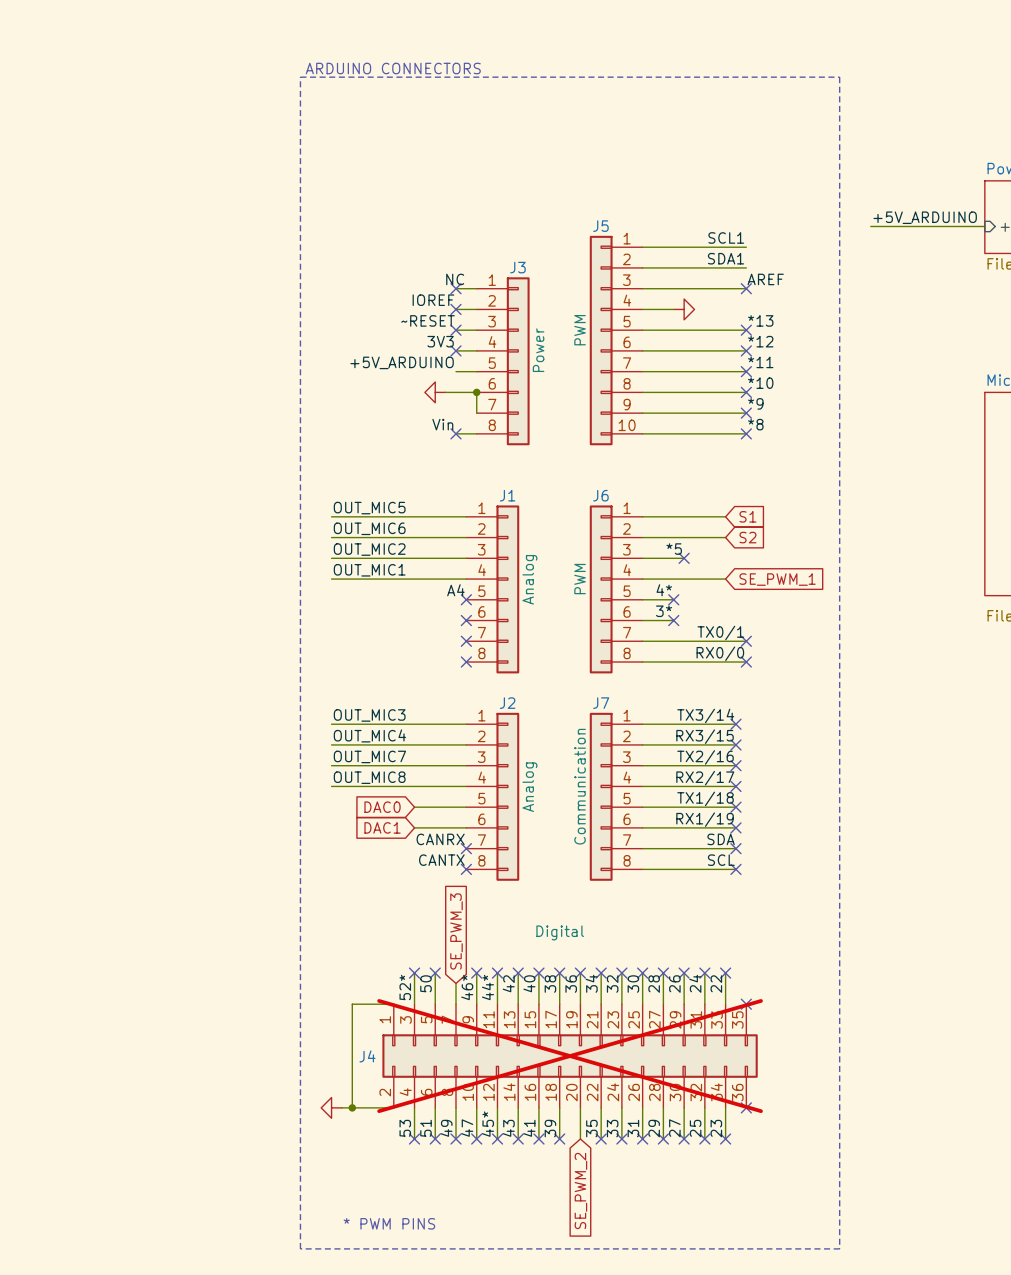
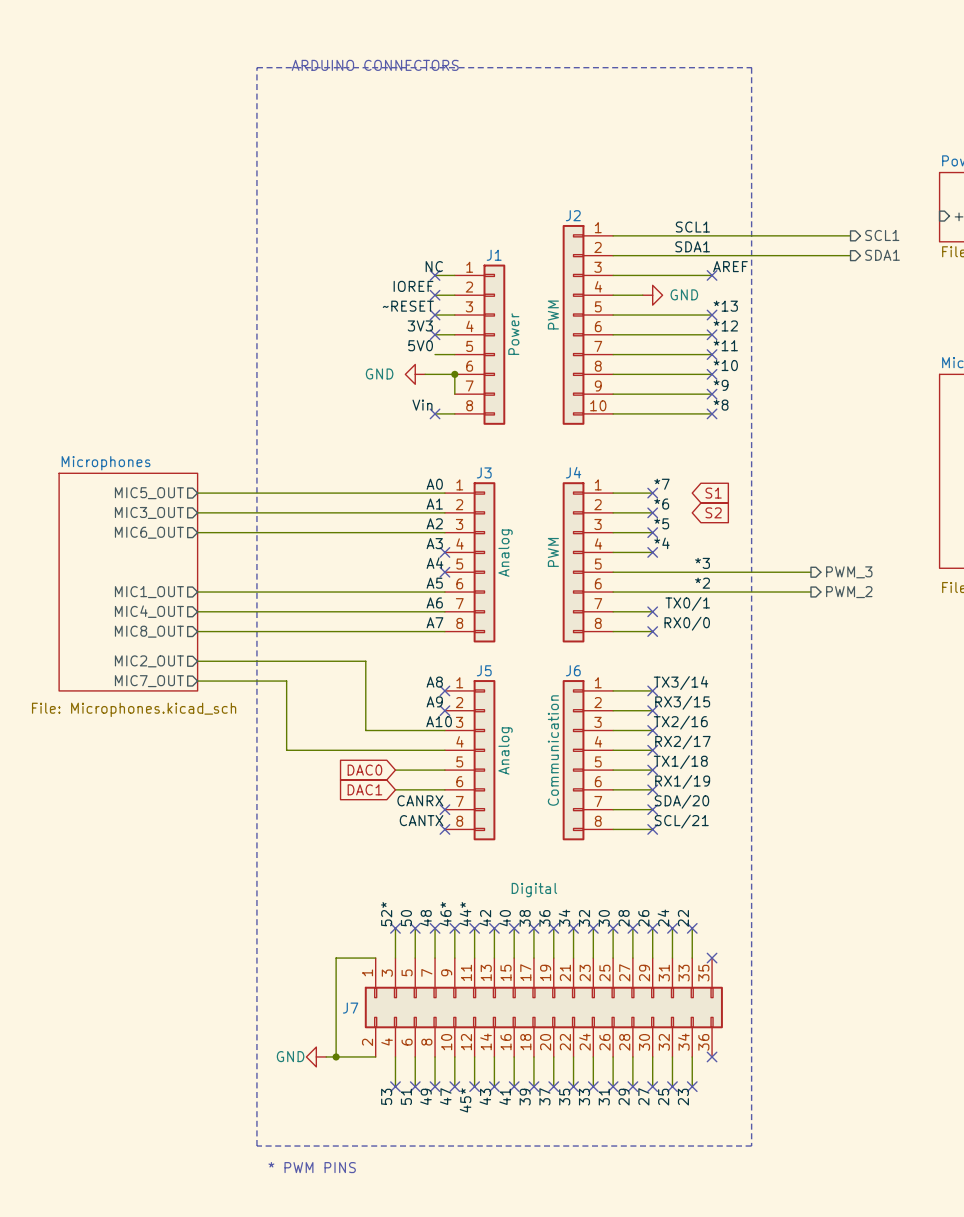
line: (300, 77) (839, 77) (839, 1248) (300, 1248) (300, 77) -> (256, 67) (256, 1146) (751, 1146) (751, 67) (256, 67)
label: +5V_ARDUINO (925, 217) -> none
J5 name: J5 (600, 226) -> J2 (573, 215)
wire: (870, 226) (984, 226) -> none
sheet pin: none -> SCL1 (882, 235)
wire: none -> (712, 235) (850, 235)
J3 name: J3 (517, 267) -> J1 (494, 255)
wire: none -> (712, 255) (850, 255)
sheet pin: none -> SDA1 (882, 255)
power symbol text: none -> GND (684, 294)
label: +5V_ARDUINO (402, 362) -> 5V0 (420, 345)
power symbol text: none -> GND (379, 373)
J1 name: J1 (507, 495) -> J3 (484, 472)
J6 name: J6 (600, 495) -> J4 (573, 472)
label: none -> A0 (434, 484)
label: none -> *7 (661, 484)
label: OUT_MIC5 (369, 508) -> none
sheet pin: none -> MIC5_OUT (149, 493)
wire: none -> (197, 493) (316, 493)
wire: (684, 516) (725, 516) -> none
no-connect mark: none -> (652, 493)
label: OUT_MIC6 (369, 528) -> none
label: none -> A1 (434, 504)
label: none -> *6 (661, 504)
sheet pin: none -> MIC3_OUT (149, 512)
wire: none -> (197, 512) (316, 512)
wire: (684, 537) (725, 537) -> none
no-connect mark: none -> (652, 512)
label: OUT_MIC2 (369, 549) -> none
label: none -> A2 (434, 523)
label position: *5 (674, 549) -> *5 (661, 523)
sheet pin: none -> MIC6_OUT (149, 532)
wire: none -> (197, 532) (316, 532)
label: none -> A3 (434, 543)
label: none -> *4 (661, 543)
label: OUT_MIC1 (369, 570) -> none
wire: (331, 579) (466, 579) -> none
no-connect mark: none -> (444, 552)
wire: (684, 579) (725, 579) -> none
no-connect mark: none -> (652, 552)
global label: SE_PWM_1 (777, 579) -> none
label: 4* (664, 590) -> none
label: none -> *3 (702, 563)
wire: none -> (642, 572) (810, 572)
no-connect mark: (673, 599) -> none
sheet pin: none -> PWM_3 (849, 572)
sheet Microphones: none -> File: Microphones.kicad_sch (128, 582)
label: none -> A5 (434, 583)
label: 3* (664, 611) -> none
label: none -> *2 (702, 583)
sheet pin: none -> MIC1_OUT (149, 592)
wire: none -> (197, 592) (444, 592)
no-connect mark: (466, 620) -> none
wire: none -> (642, 592) (810, 592)
no-connect mark: (673, 620) -> none
sheet pin: none -> PWM_2 (849, 592)
label: none -> A6 (434, 602)
sheet pin: none -> MIC4_OUT (149, 611)
wire: none -> (197, 611) (444, 611)
no-connect mark: (466, 641) -> none
wire: (684, 641) (746, 641) -> none
no-connect mark: none -> (652, 611)
no-connect mark: (746, 641) -> none
label: none -> A7 (434, 622)
sheet pin: none -> MIC8_OUT (149, 631)
wire: none -> (197, 631) (444, 631)
no-connect mark: (466, 662) -> none
wire: (684, 662) (746, 662) -> none
no-connect mark: none -> (652, 631)
no-connect mark: (746, 662) -> none
sheet pin: none -> MIC2_OUT (149, 661)
J2 name: J2 (507, 703) -> J5 (484, 670)
J7 name: J7 (601, 703) -> J6 (573, 670)
sheet pin: none -> MIC7_OUT (149, 681)
wire: none -> (197, 681) (286, 681) (286, 750) (316, 750)
label: none -> A8 (434, 682)
label: OUT_MIC3 (369, 715) -> none
label position: TX3/14 (705, 715) -> TX3/14 (681, 683)
wire: (331, 724) (466, 724) -> none
no-connect mark: none -> (444, 690)
wire: (684, 724) (735, 724) -> none
no-connect mark: none -> (652, 690)
no-connect mark: (735, 724) -> none
label: OUT_MIC4 (369, 735) -> none
label: none -> A9 (434, 701)
label position: RX3/15 (705, 736) -> RX3/15 (682, 702)
wire: (331, 744) (466, 744) -> none
no-connect mark: none -> (444, 710)
wire: (684, 744) (735, 744) -> none
no-connect mark: none -> (652, 710)
no-connect mark: (735, 744) -> none
label: OUT_MIC7 (369, 756) -> none
label: none -> A10 (439, 721)
label position: TX2/16 (705, 757) -> TX2/16 (680, 722)
wire: (331, 765) (383, 765) -> (197, 661) (365, 661) (365, 730)
wire: (684, 765) (735, 765) -> none
no-connect mark: none -> (652, 730)
no-connect mark: (735, 765) -> none
label: OUT_MIC8 (369, 777) -> none
label position: RX2/17 (705, 778) -> RX2/17 (682, 742)
wire: (684, 786) (735, 786) -> none
no-connect mark: none -> (652, 750)
no-connect mark: (735, 786) -> none
label position: TX1/18 (705, 798) -> TX1/18 (680, 762)
wire: (684, 807) (735, 807) -> none
no-connect mark: none -> (652, 770)
no-connect mark: (735, 807) -> none
label position: RX1/19 (705, 819) -> RX1/19 (682, 781)
wire: (684, 827) (735, 827) -> none
no-connect mark: none -> (652, 789)
no-connect mark: (735, 827) -> none
label: SDA (721, 839) -> SDA/20 (681, 801)
wire: (684, 848) (735, 848) -> none
no-connect mark: none -> (652, 809)
no-connect mark: (735, 848) -> none
label: SCL (721, 860) -> SCL/21 (681, 821)
wire: (684, 869) (735, 869) -> none
no-connect mark: none -> (652, 829)
no-connect mark: (735, 869) -> none
global label: SE_PWM_3 (456, 931) -> none
label: none -> 48 (425, 918)
wire: none -> (435, 928) (435, 938)
no-connect mark: none -> (435, 928)
label position: 50 (426, 983) -> 50 (406, 918)
label position: 42 (508, 983) -> 42 (485, 918)
label position: 40 (529, 983) -> 40 (505, 918)
label position: 34 (591, 983) -> 34 (564, 918)
label position: 24 (695, 983) -> 24 (663, 918)
label position: 38 (550, 984) -> 38 (525, 918)
label position: 36 (571, 984) -> 36 (544, 918)
label position: 32 (612, 984) -> 32 (584, 918)
label position: 30 (633, 984) -> 30 (604, 918)
label position: 28 (654, 984) -> 28 (624, 918)
label position: 26 (674, 984) -> 26 (643, 918)
label position: 22 (716, 984) -> 22 (683, 918)
label position: 52* (405, 987) -> 52* (386, 914)
label position: 46* (467, 987) -> 46* (445, 914)
label position: 44* (487, 987) -> 44* (465, 914)
J4 name: J4 (367, 1056) -> J7 (350, 1008)
J4 do-not-place cross: (570, 1056) -> none
power symbol text: none -> GND (290, 1056)
label position: 45* (487, 1124) -> 45* (465, 1100)
label position: 53 (405, 1128) -> 53 (386, 1096)
label position: 51 (426, 1128) -> 51 (406, 1096)
label position: 49 (446, 1128) -> 49 (425, 1096)
label position: 47 (467, 1128) -> 47 (445, 1096)
label position: 43 (508, 1128) -> 43 (485, 1096)
label position: 41 (529, 1128) -> 41 (505, 1096)
label position: 39 (550, 1128) -> 39 (525, 1097)
label position: 35 (591, 1128) -> 35 (564, 1097)
label position: 33 (612, 1128) -> 33 (584, 1097)
label position: 31 (633, 1128) -> 31 (604, 1097)
label position: 29 (654, 1128) -> 29 (624, 1097)
label position: 27 (674, 1128) -> 27 (643, 1096)
label position: 25 (695, 1128) -> 25 (663, 1097)
label position: 23 (716, 1128) -> 23 (683, 1097)
no-connect mark: none -> (553, 1086)
label: none -> 37 (544, 1096)
global label: SE_PWM_2 (580, 1190) -> none
text position: * PWM PINS (389, 1223) -> * PWM PINS (312, 1167)

